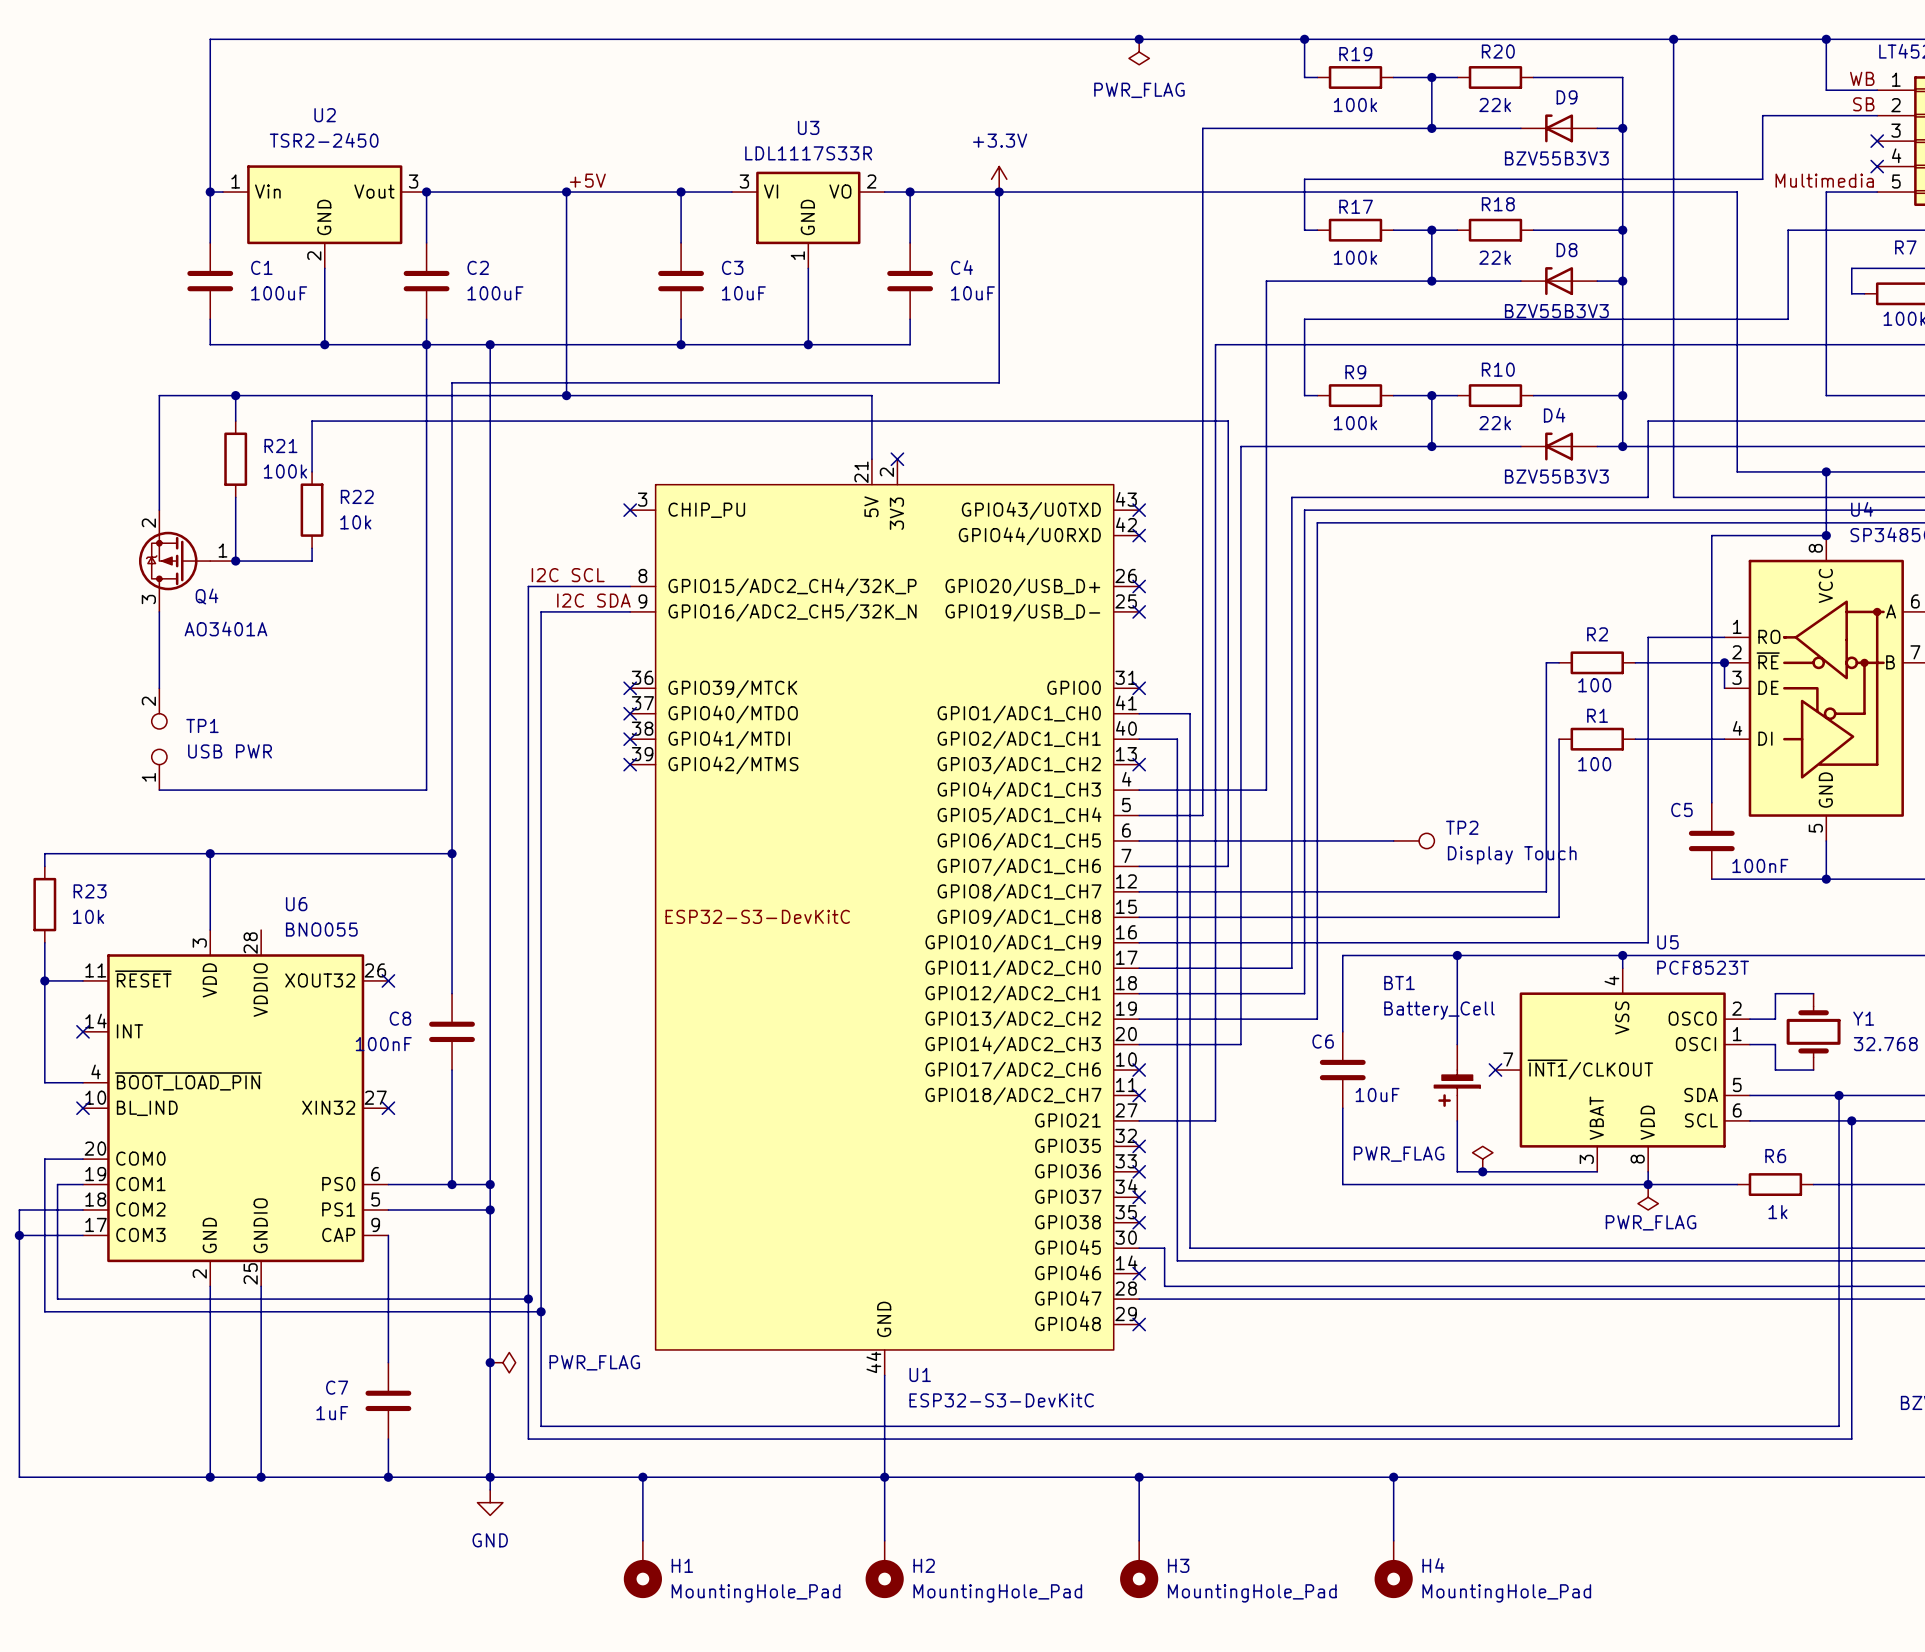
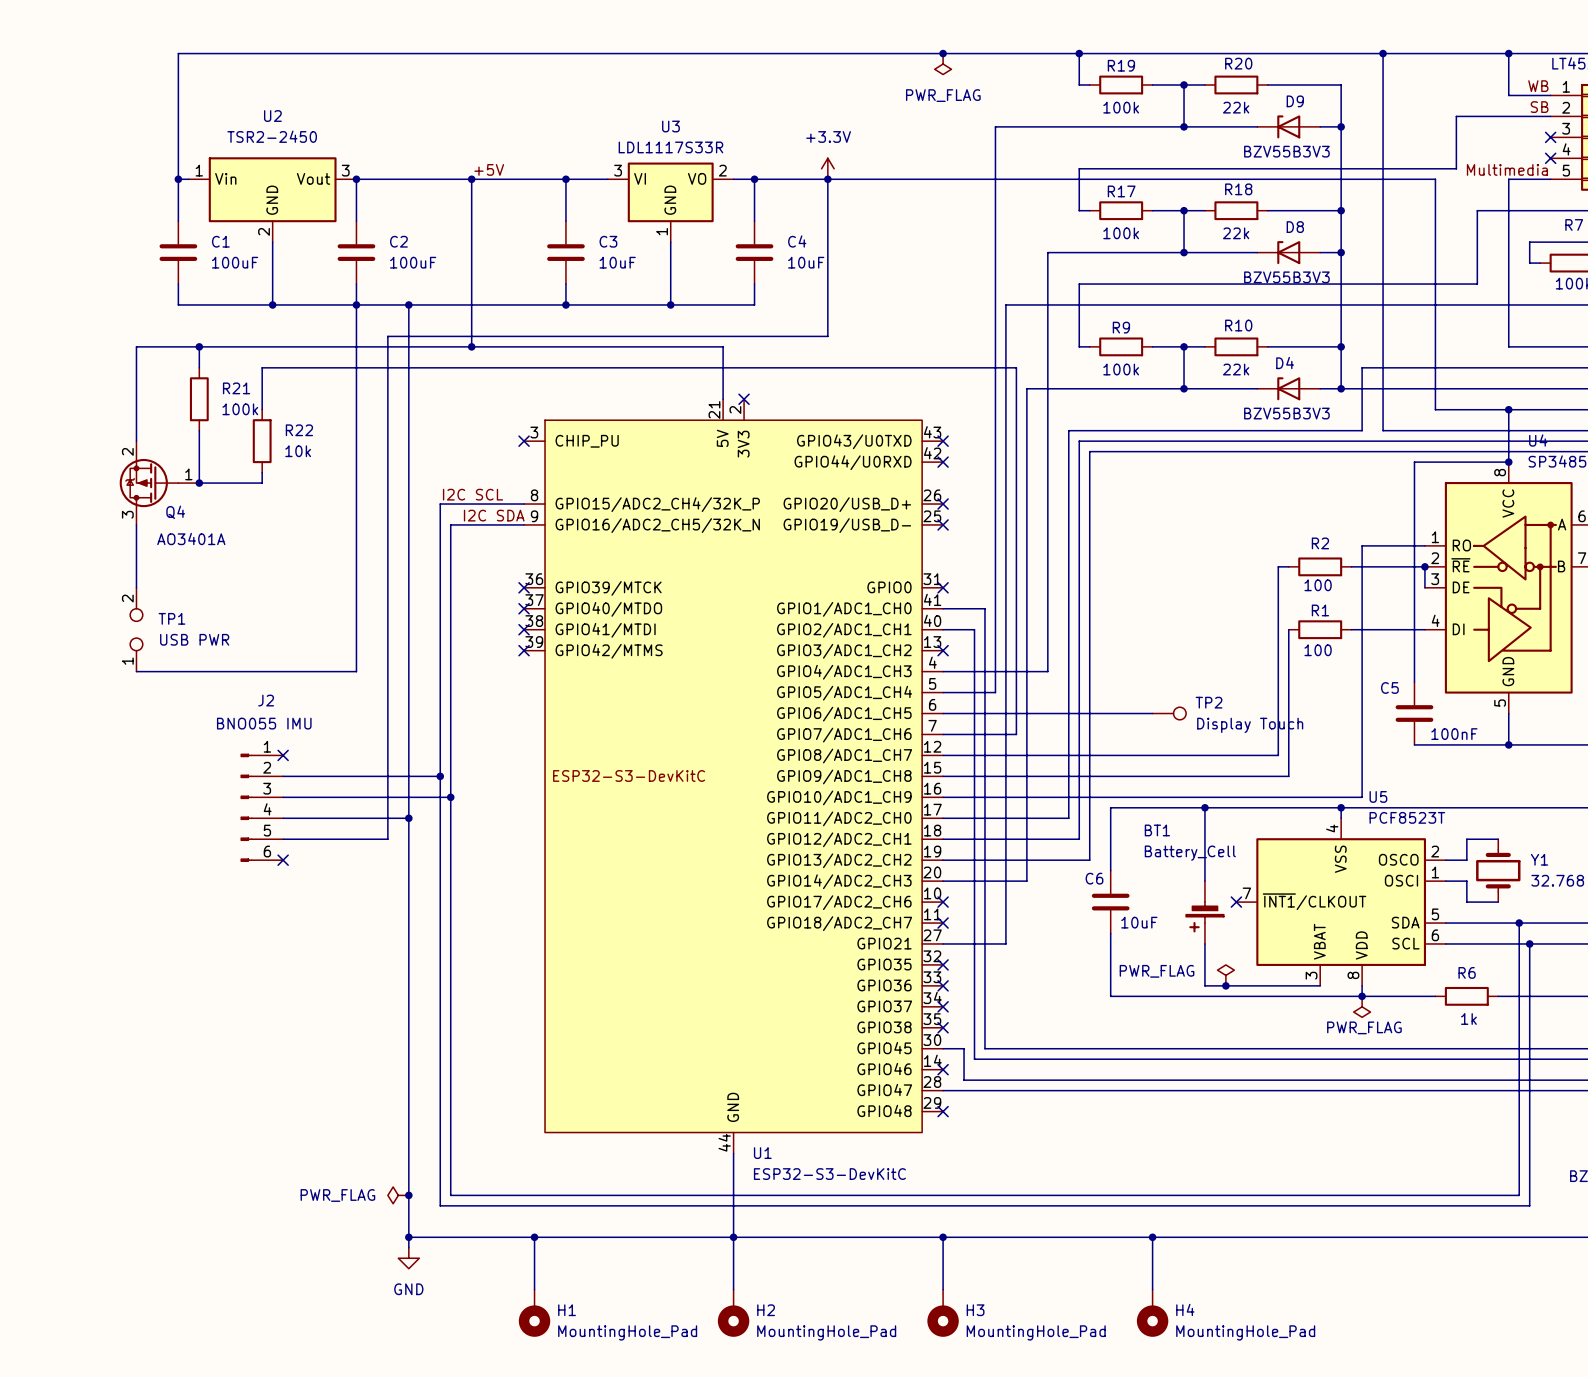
wire: (464, 382) (452, 382) (452, 993) -> (387, 336) (387, 839) (283, 839)
wire: (210, 853) (210, 930) -> none
junction: (210, 853) -> none
wire: (452, 853) (44, 853) (44, 866) -> none
junction: (452, 853) -> none
no-connect mark: none -> (283, 755)
R23: 10k (44, 904) -> none
wire: none -> (283, 776) (440, 776)
junction: none -> (440, 776)
wire: (44, 942) (44, 1082) (83, 1082) -> none
wire: none -> (283, 797) (450, 797)
junction: none -> (450, 797)
J2: none -> BNO055 IMU (261, 807)
wire: none -> (283, 818) (408, 818)
junction: none -> (408, 818)
wire: (44, 980) (83, 980) -> none
junction: (44, 980) -> none
no-connect mark: (388, 980) -> none
no-connect mark: none -> (283, 860)
no-connect mark: (83, 1031) -> none
C8: 100nF (452, 1031) -> none
wire: (452, 1070) (452, 1184) -> none
no-connect mark: (83, 1108) -> none
U6: BNO055 (235, 1108) -> none
no-connect mark: (388, 1108) -> none
wire: (83, 1159) (44, 1159) (44, 1311) (541, 1311) -> none
wire: (83, 1184) (57, 1184) (57, 1299) (528, 1299) -> none
wire: (388, 1184) (490, 1184) -> none
junction: (452, 1184) -> none
junction: (490, 1184) -> none
wire: (83, 1210) (19, 1210) (19, 1477) (490, 1477) -> none
wire: (388, 1210) (490, 1210) -> none
junction: (490, 1210) -> none
wire: (19, 1235) (83, 1235) -> none
junction: (19, 1235) -> none
wire: (388, 1235) (388, 1362) -> none
wire: (210, 1286) (210, 1477) -> none
wire: (261, 1286) (261, 1477) -> none
junction: (528, 1299) -> none
junction: (541, 1311) -> none
junction: (490, 1362) -> none
power symbol rotation: 0° (502, 1362) -> 180° (398, 1195)
power symbol position: PWR_FLAG (502, 1362) -> PWR_FLAG (398, 1195)
C7: 1uF (388, 1400) -> none
junction: none -> (408, 1195)
wire: (388, 1439) (388, 1477) -> none
junction: (210, 1477) -> none
junction: (261, 1477) -> none
junction: (388, 1477) -> none

